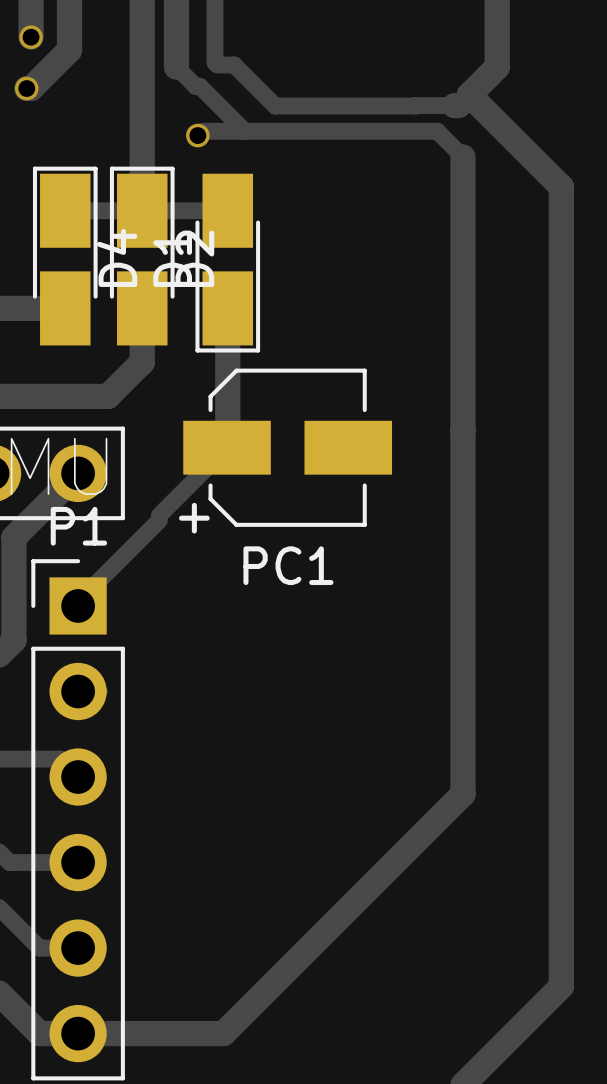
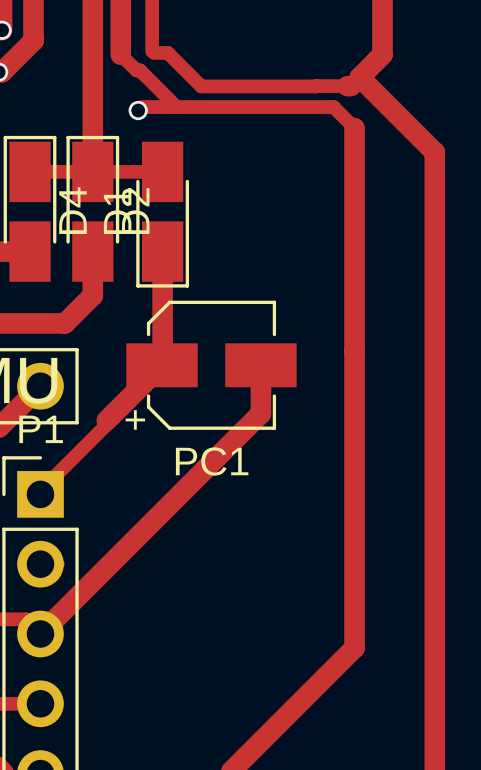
track width: thin (227, 447) (159, 515) -> thick (162, 365) (106, 420)
track: none -> (260, 365) (260, 413) (40, 633)

